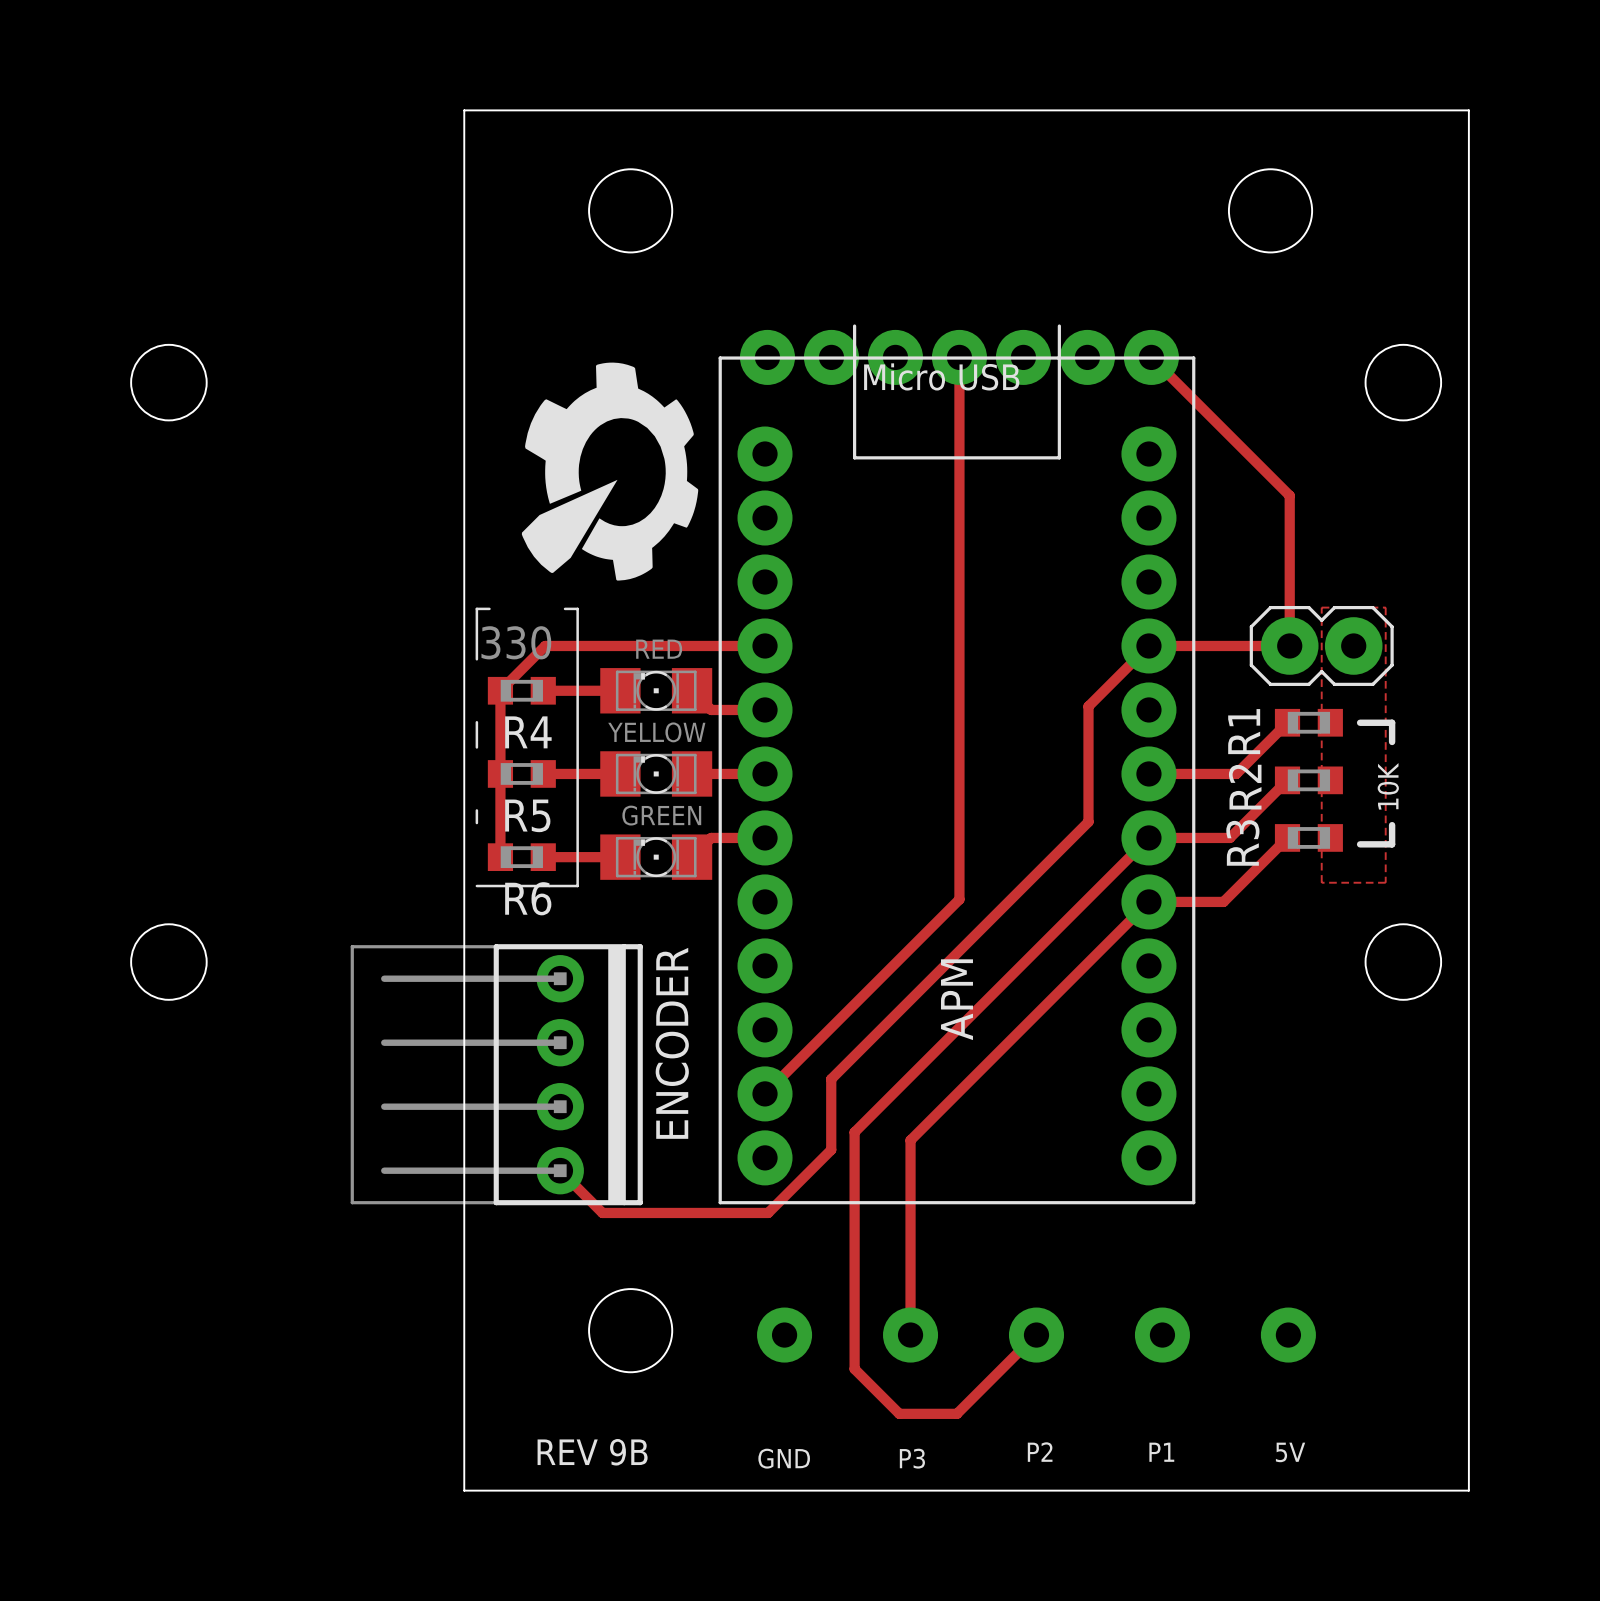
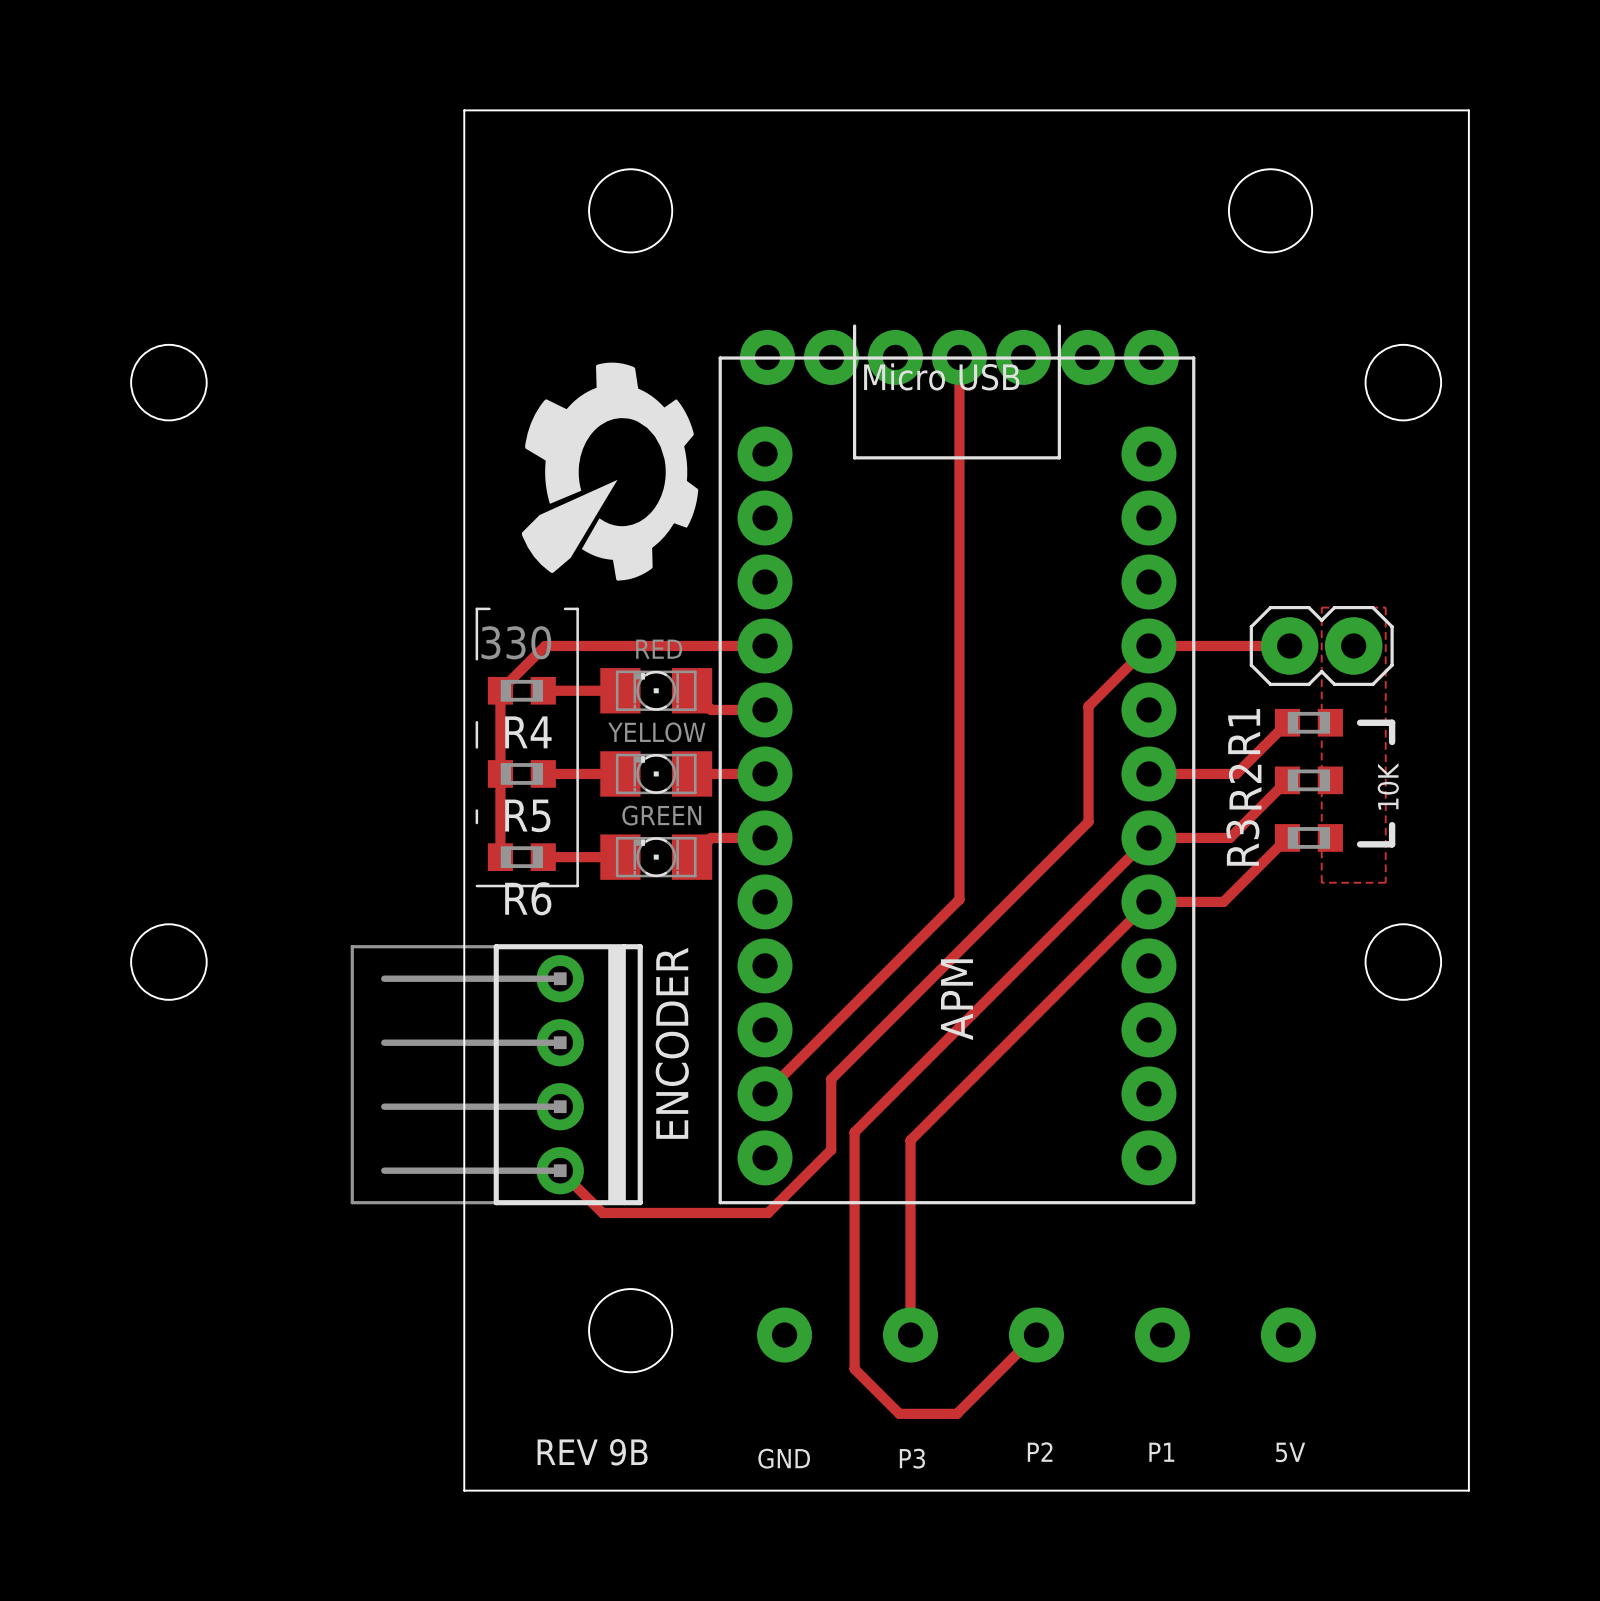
track: (1151, 357) (1289, 495) (1289, 645) -> none

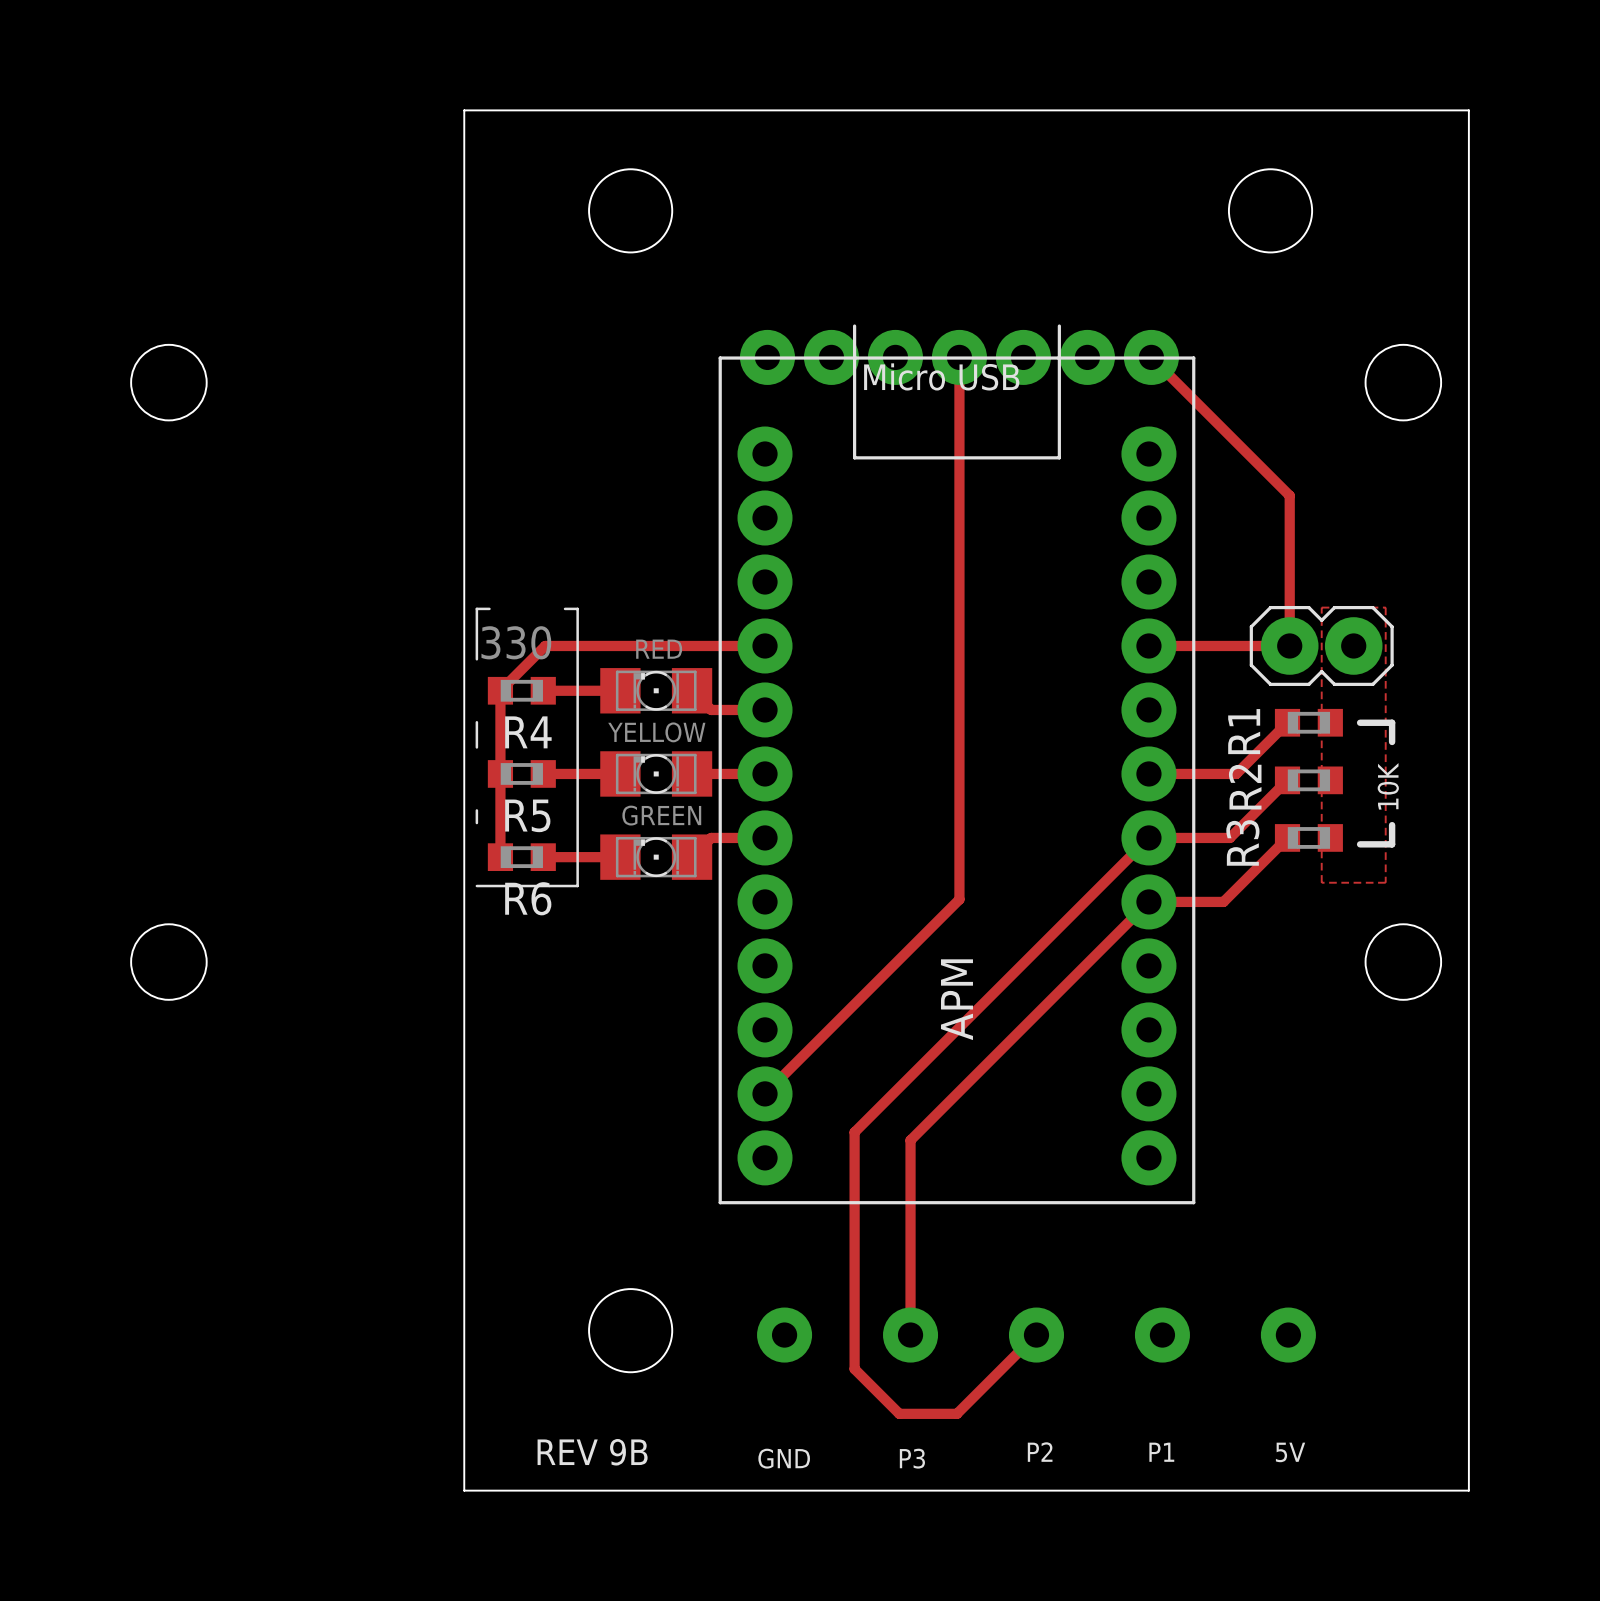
track: none -> (1151, 357) (1289, 495) (1289, 645)
drawing: [521, 362, 699, 581] -> none
track: (1148, 645) (1088, 706) (1088, 821) (831, 1079) (831, 1149) (768, 1212) (602, 1212) (560, 1170) -> none
ENCODER: (496, 1074) -> none

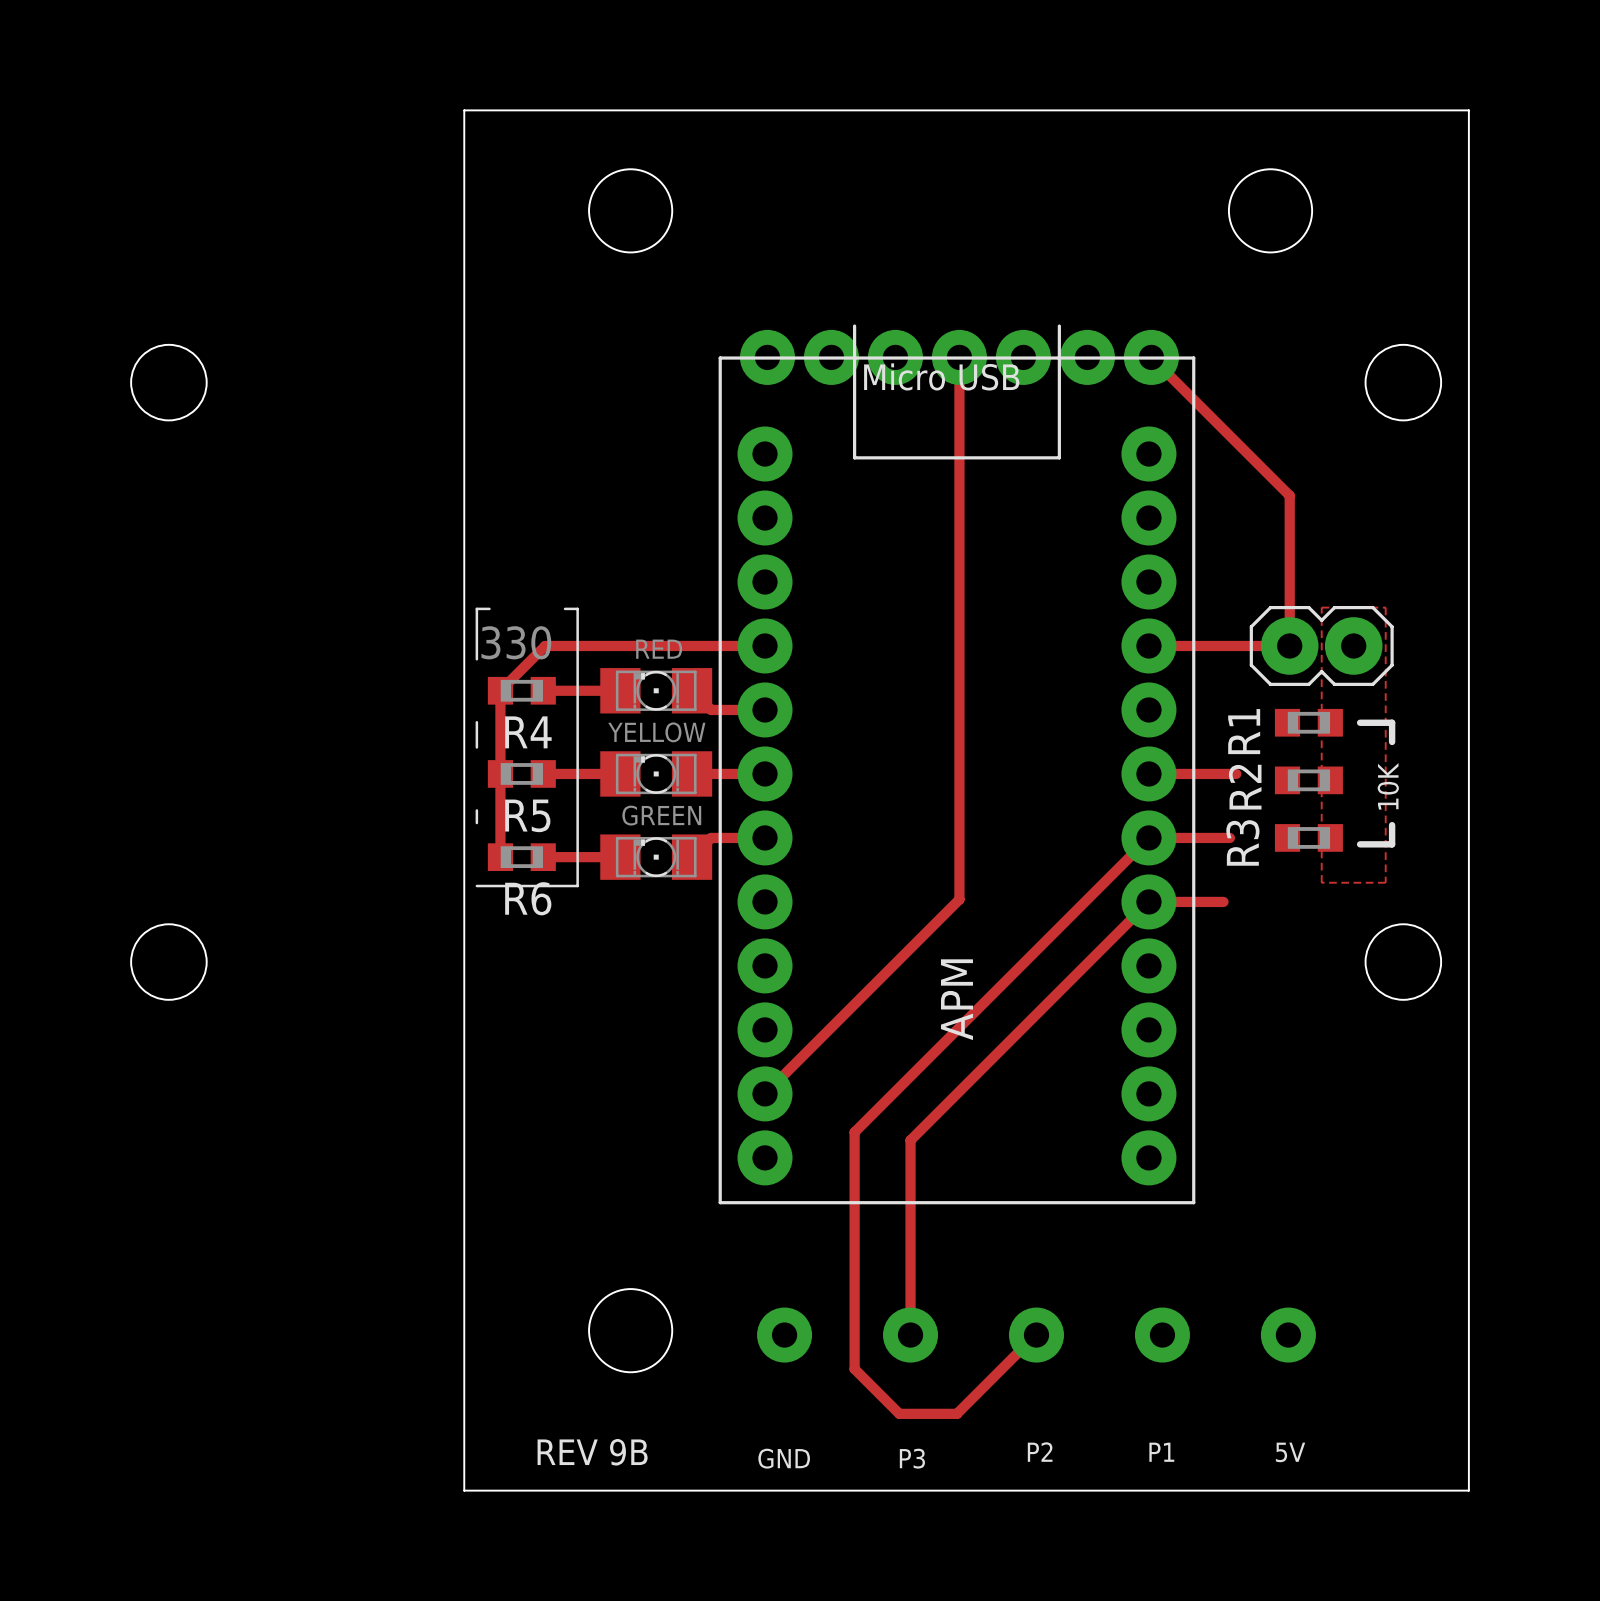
track: (1287, 722) (1236, 773) -> none
track: (1287, 780) (1229, 837) -> none
track: (1287, 837) (1223, 901) -> none

